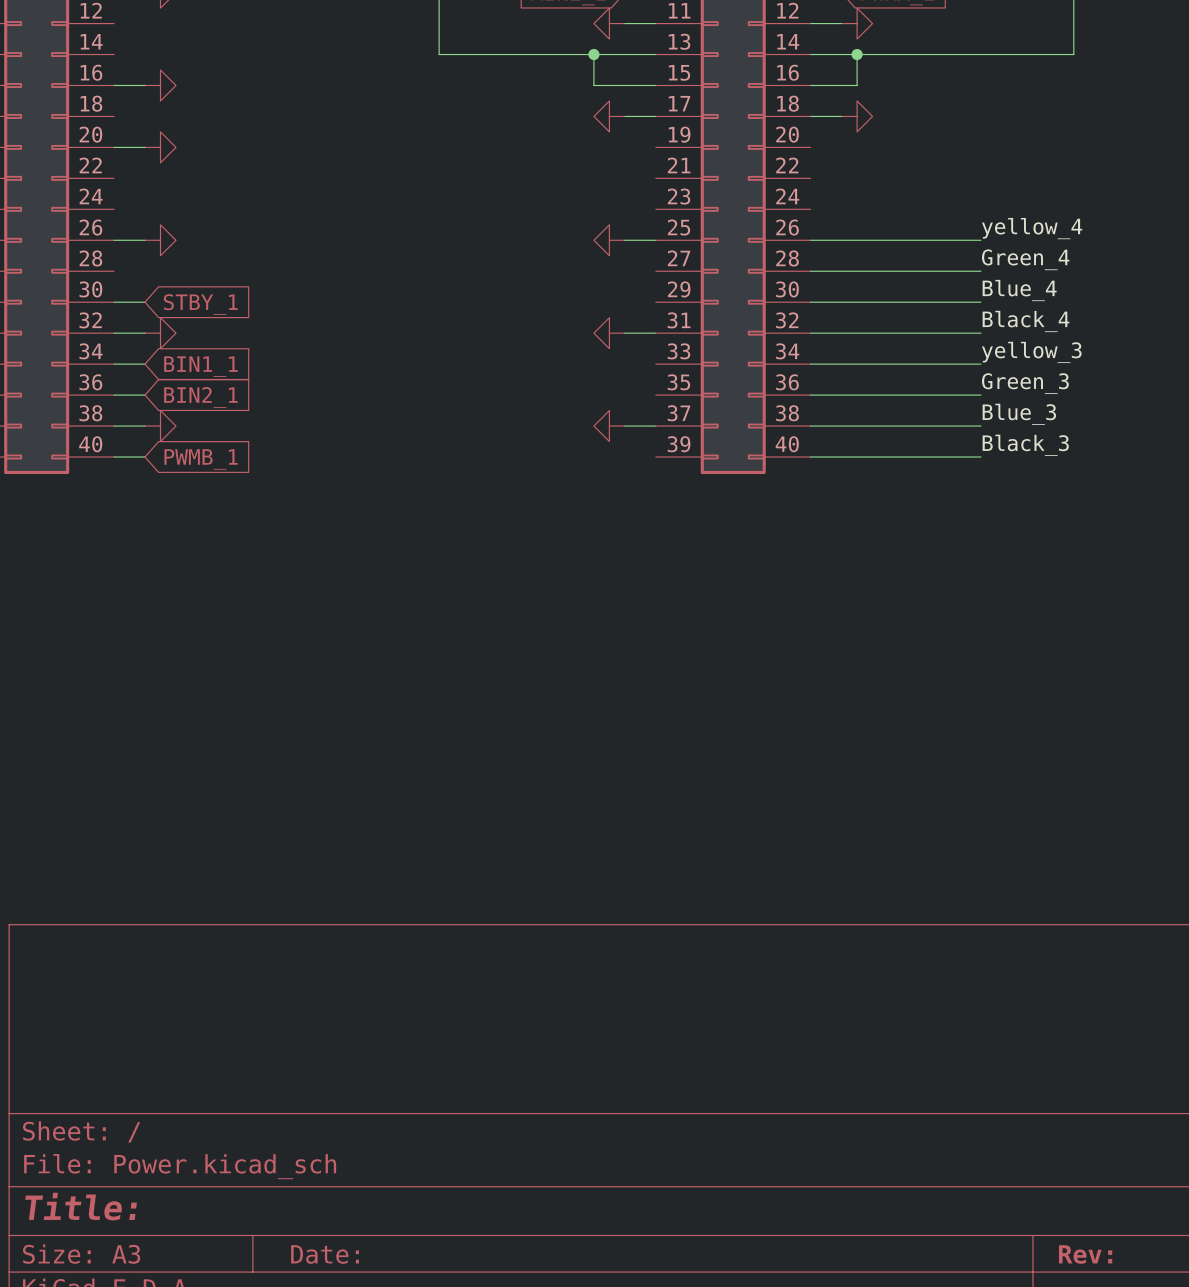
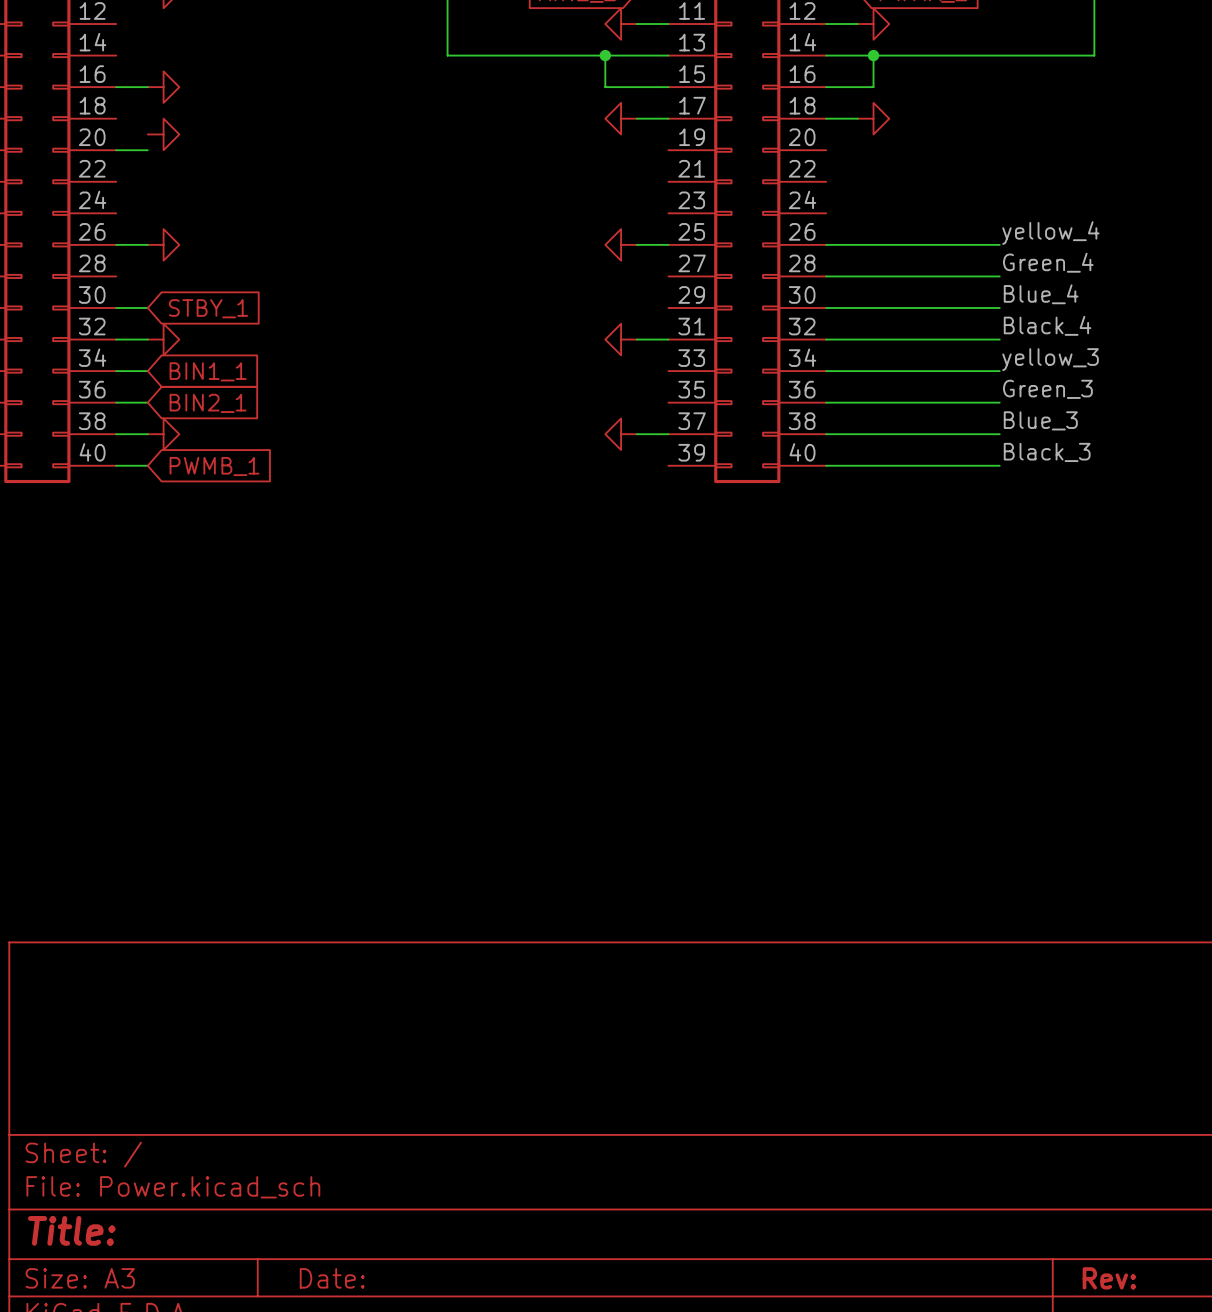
power symbol position: (160, 147) -> (163, 134)

